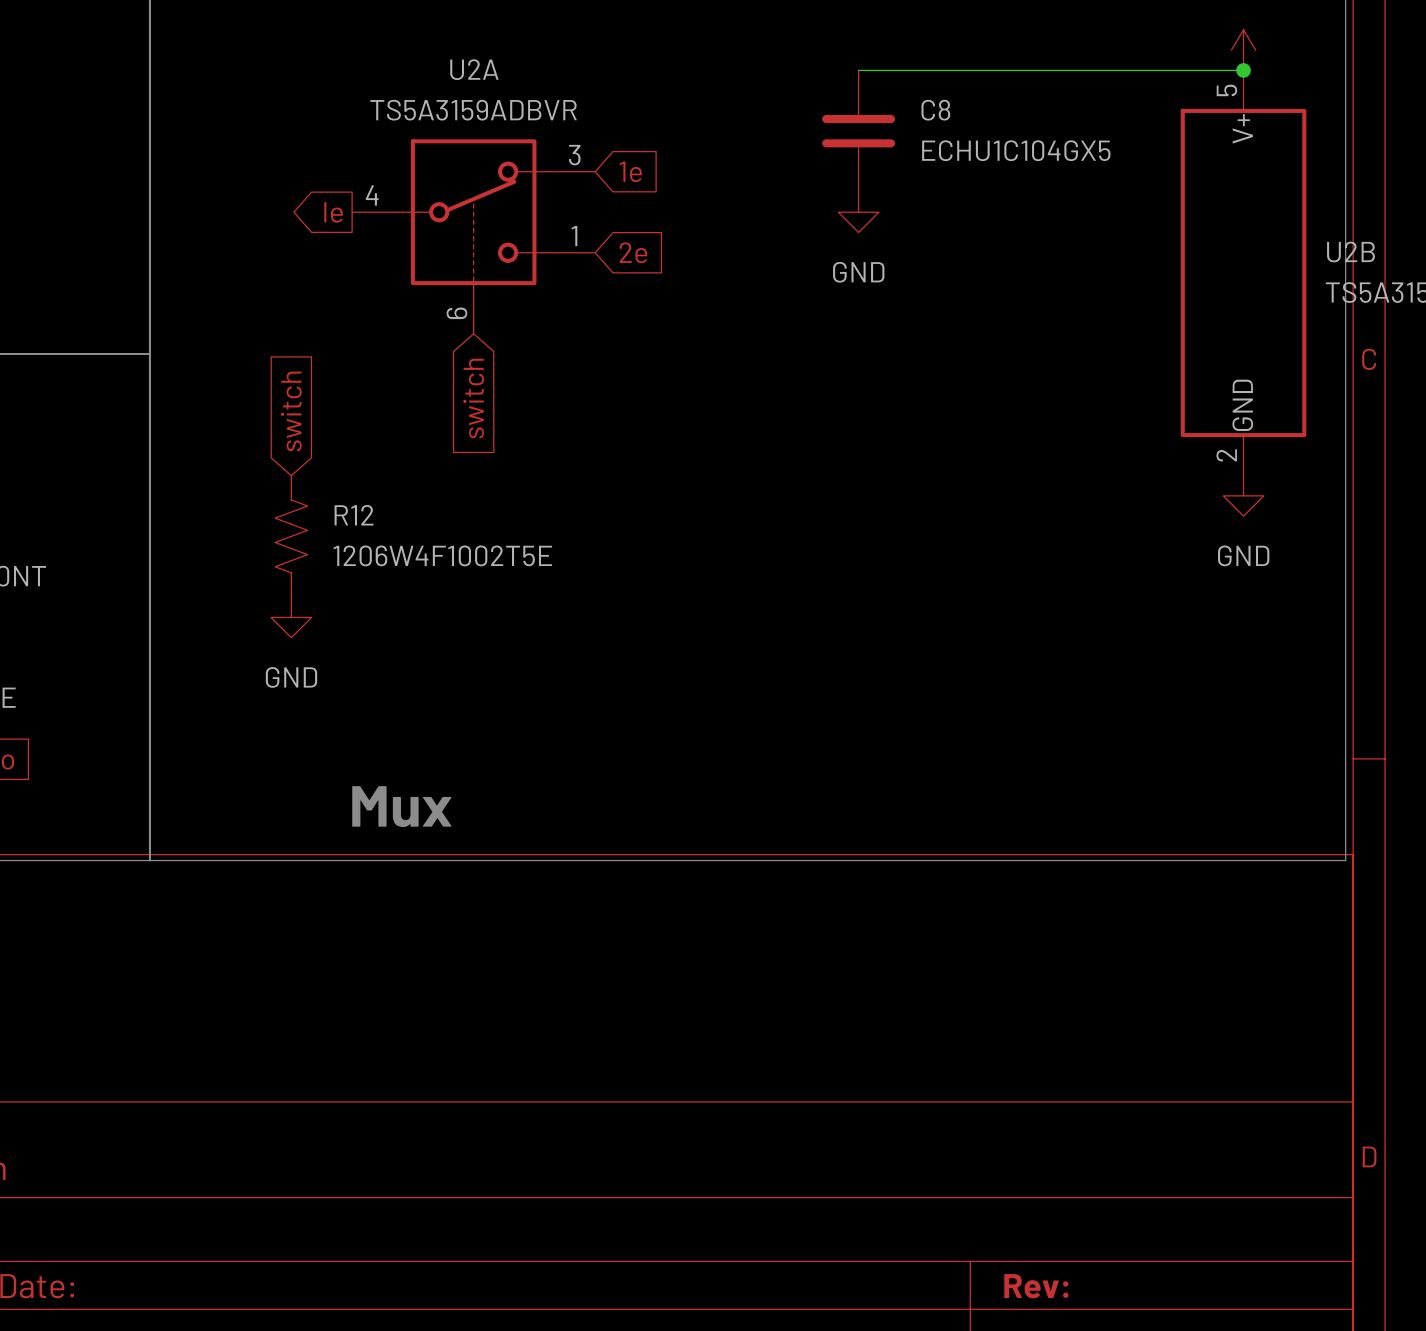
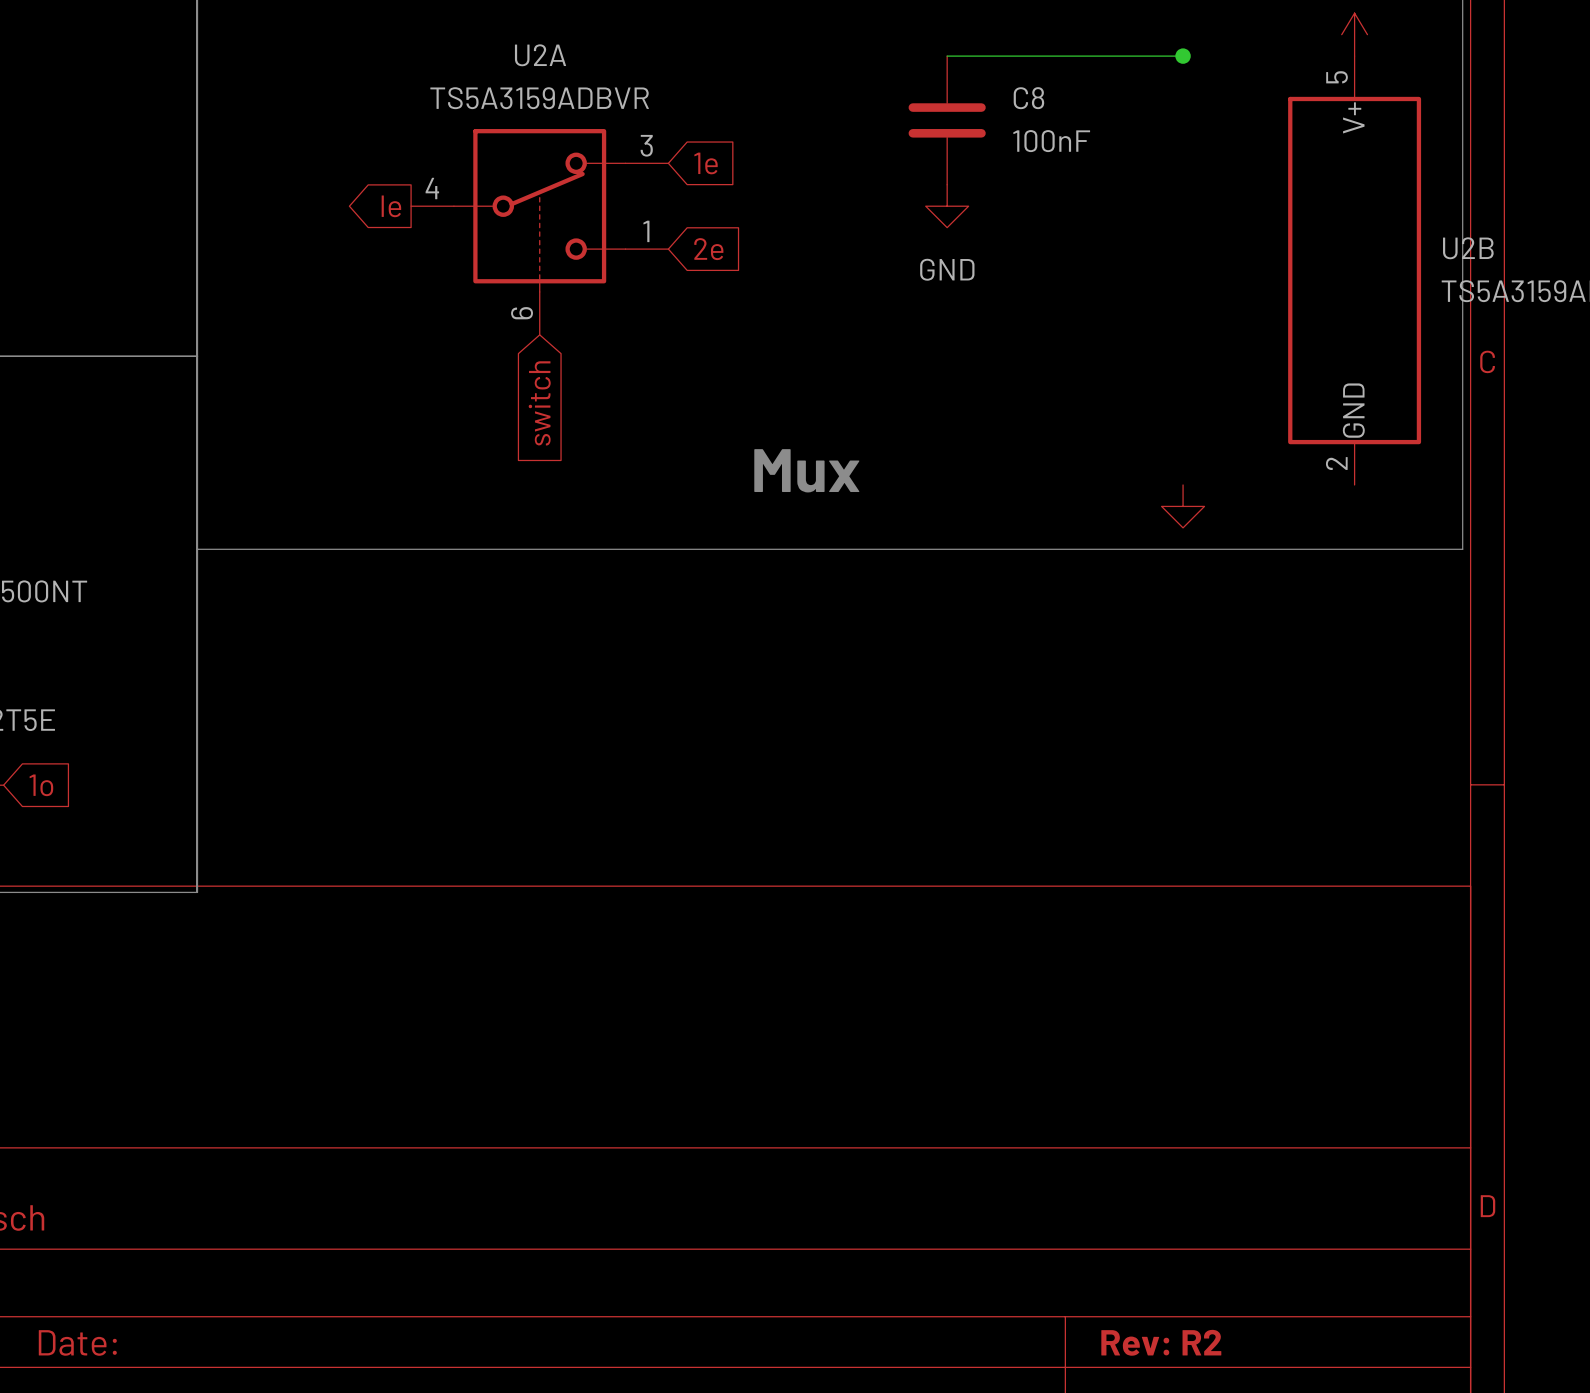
wire: (1081, 70) (1243, 70) -> none
junction: none -> (1183, 56)
junction: (1243, 70) -> none
C8 value: ECHU1C104GX5 (1016, 150) -> 100nF (1051, 141)
global label: switch (291, 411) -> none
text: none -> Mux (806, 470)
power symbol: none -> (1183, 506)
power symbol: GND (1243, 495) -> none
R12: 1206W4F1002T5E (291, 536) -> none
line: (1345, 536) (1345, 860) (150, 860) -> (1462, 549) (196, 549)
power symbol: GND (291, 617) -> none
text: Mux (401, 806) -> none
title block: Rev: (1036, 1286) -> Rev: R2 (1161, 1342)

